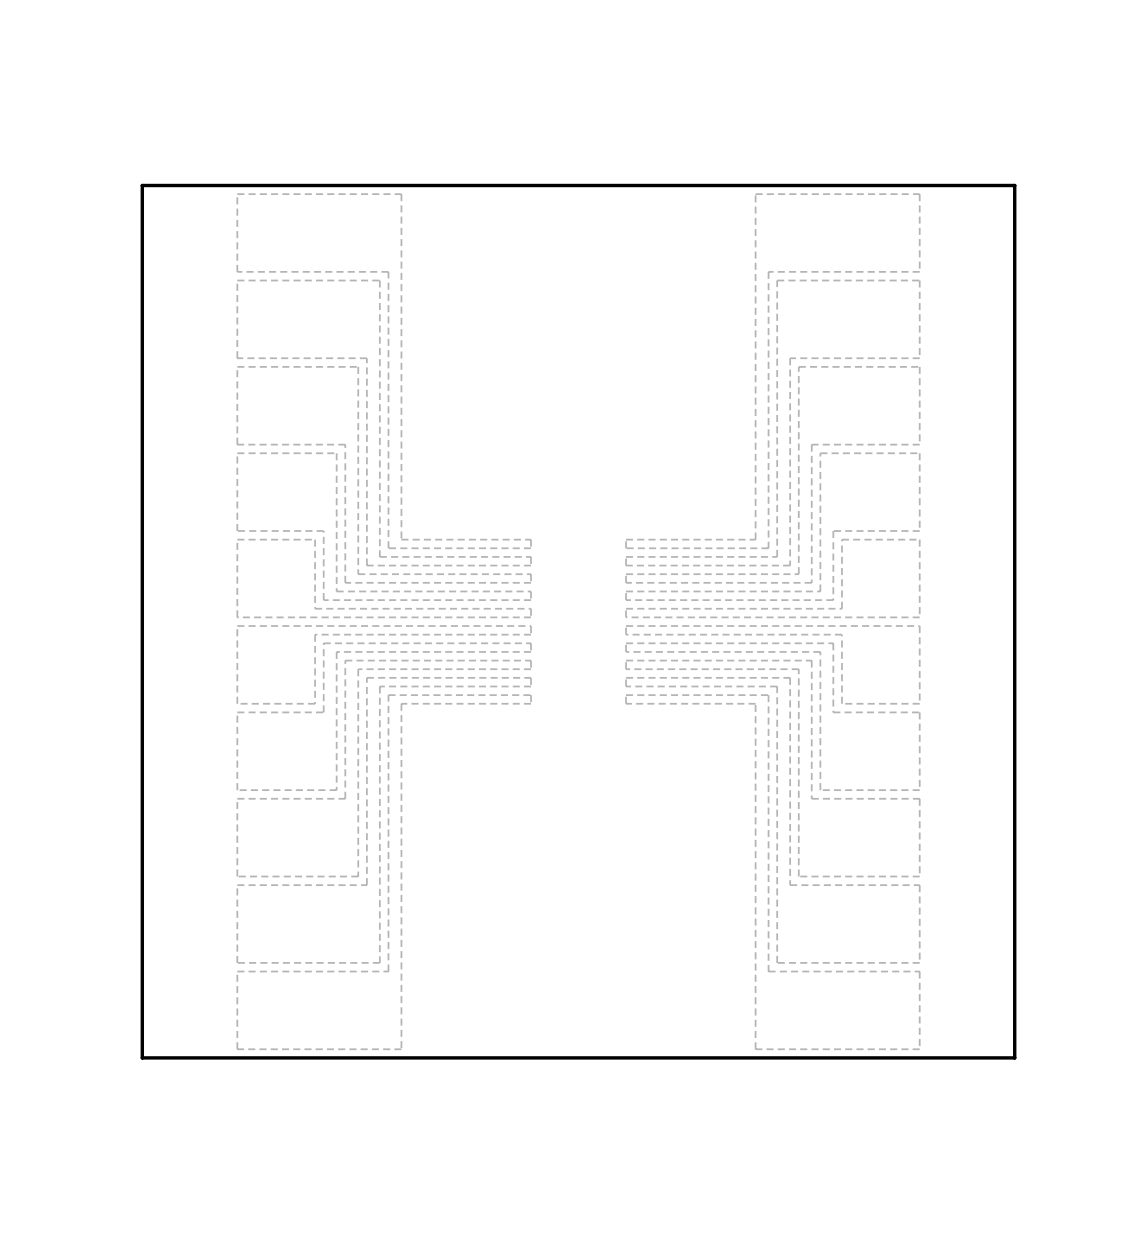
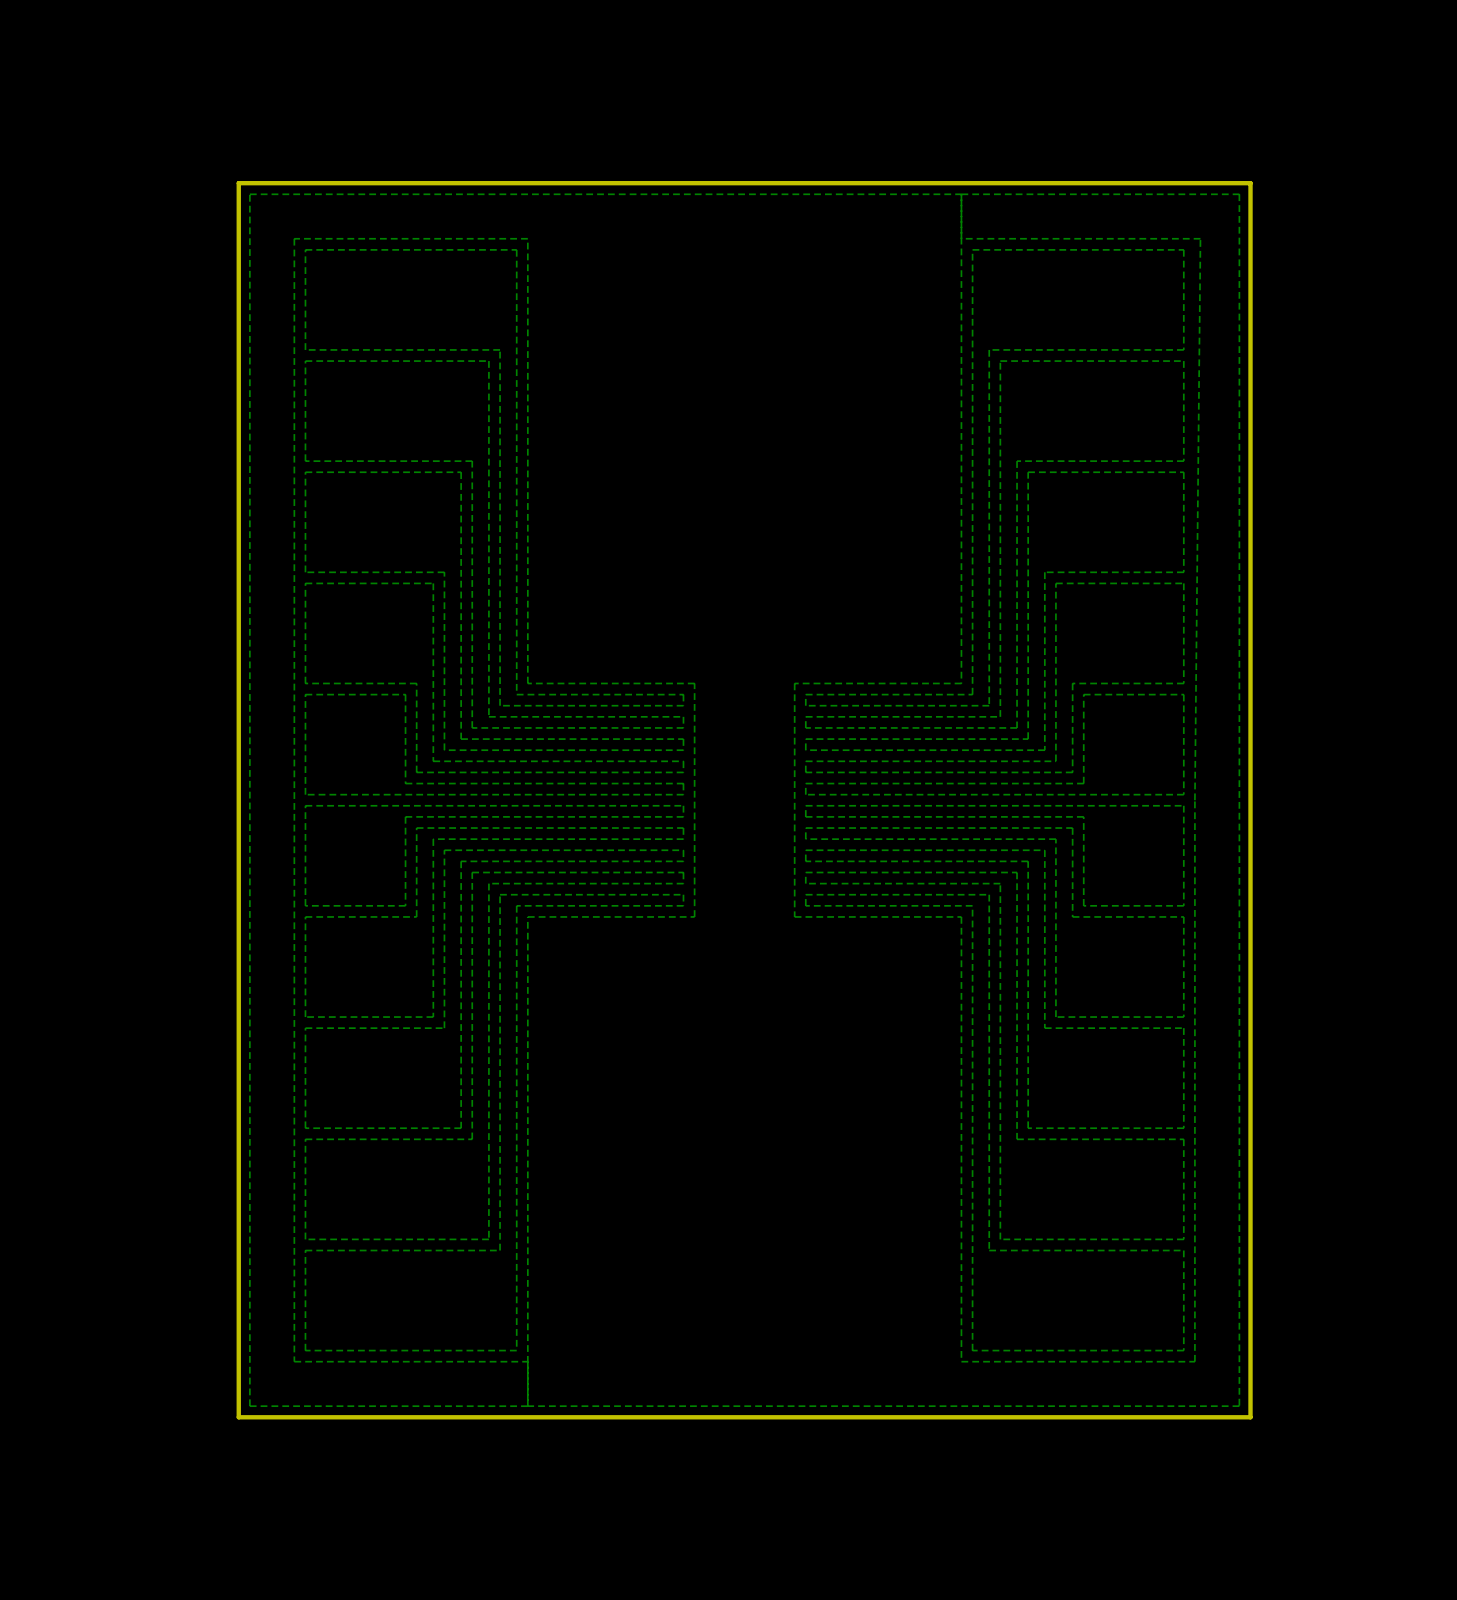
zone outline: none -> (961, 194) (961, 683) (794, 683) (794, 916) (961, 916) (961, 1361) (1194, 1361) (1194, 800) (1200, 238) (961, 238)
board edge: (1014, 185) (142, 185) (142, 1057) (1014, 1057) (1014, 185) -> (1250, 183) (1250, 1417) (238, 1417) (238, 183) (1250, 183)
zone outline: none -> (527, 1361) (294, 1361) (294, 238) (527, 238) (527, 683) (694, 683) (694, 916) (527, 916) (527, 1406)
zone outline: none -> (527, 1406) (1239, 1406) (1239, 194) (249, 194) (249, 1406) (527, 1406)

